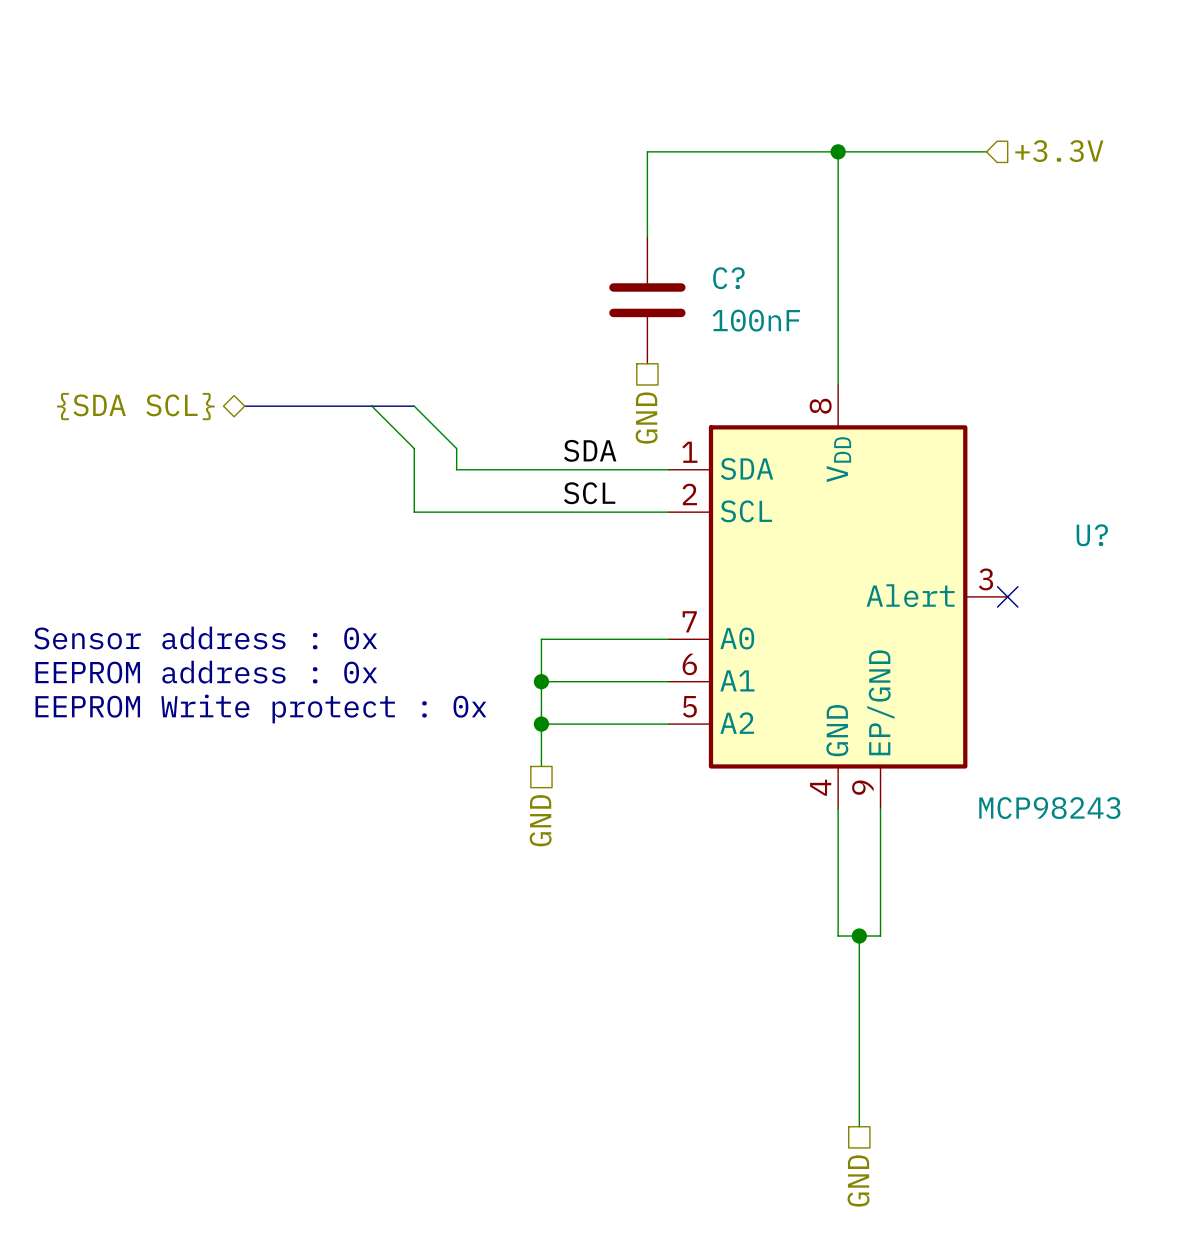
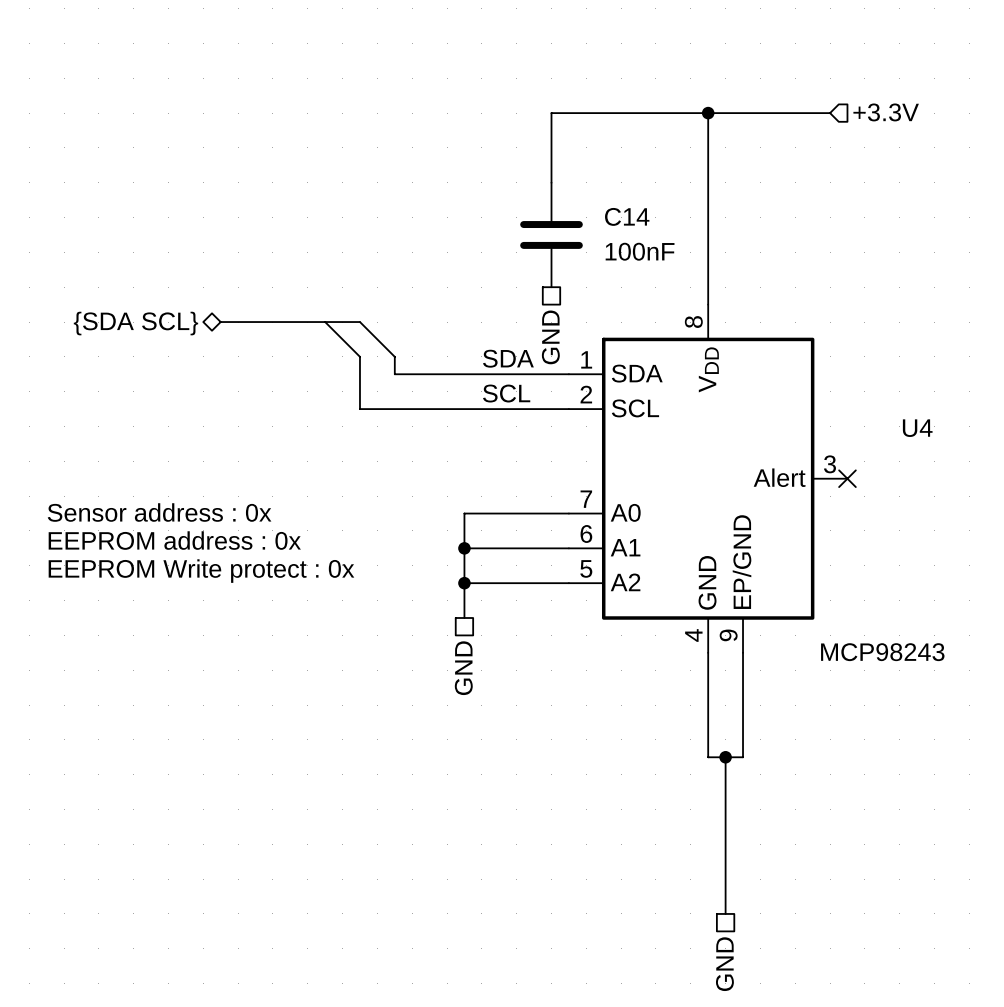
C? name: C? (728, 278) -> C14 (627, 216)
U? name: U? (1092, 535) -> U4 (917, 428)

